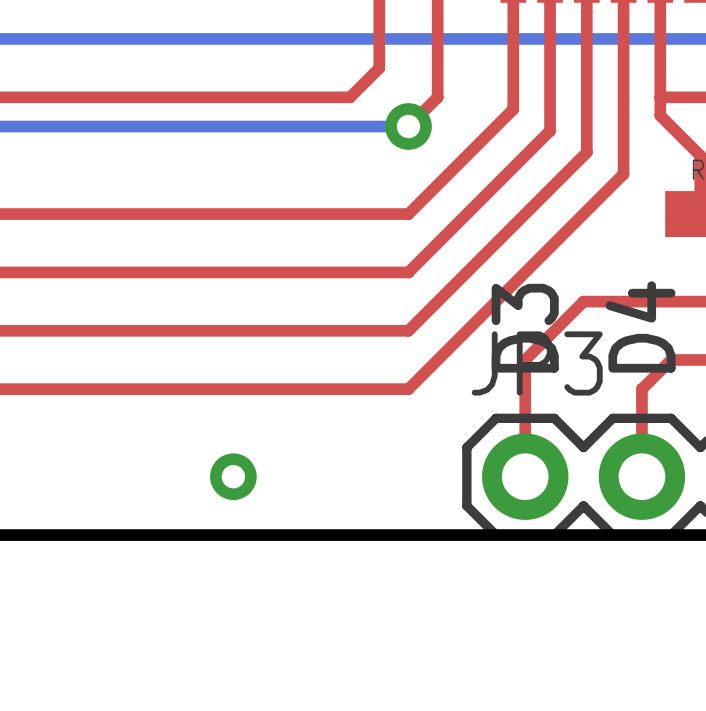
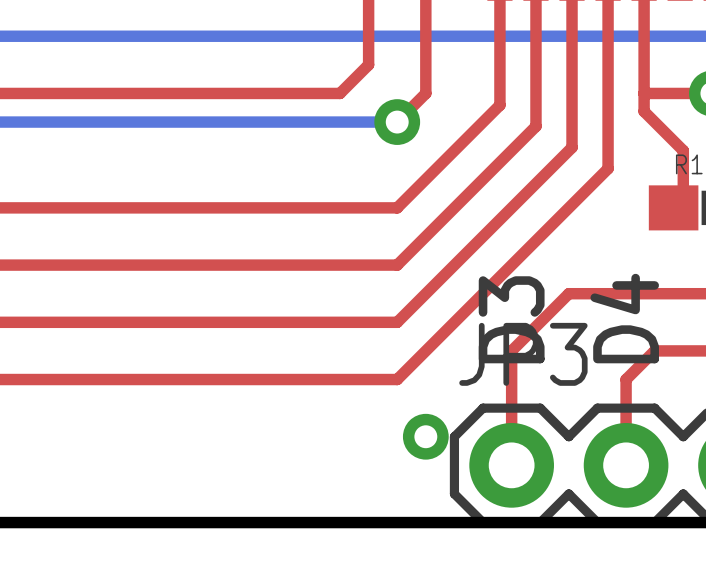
via position: (233, 476) -> (425, 436)

